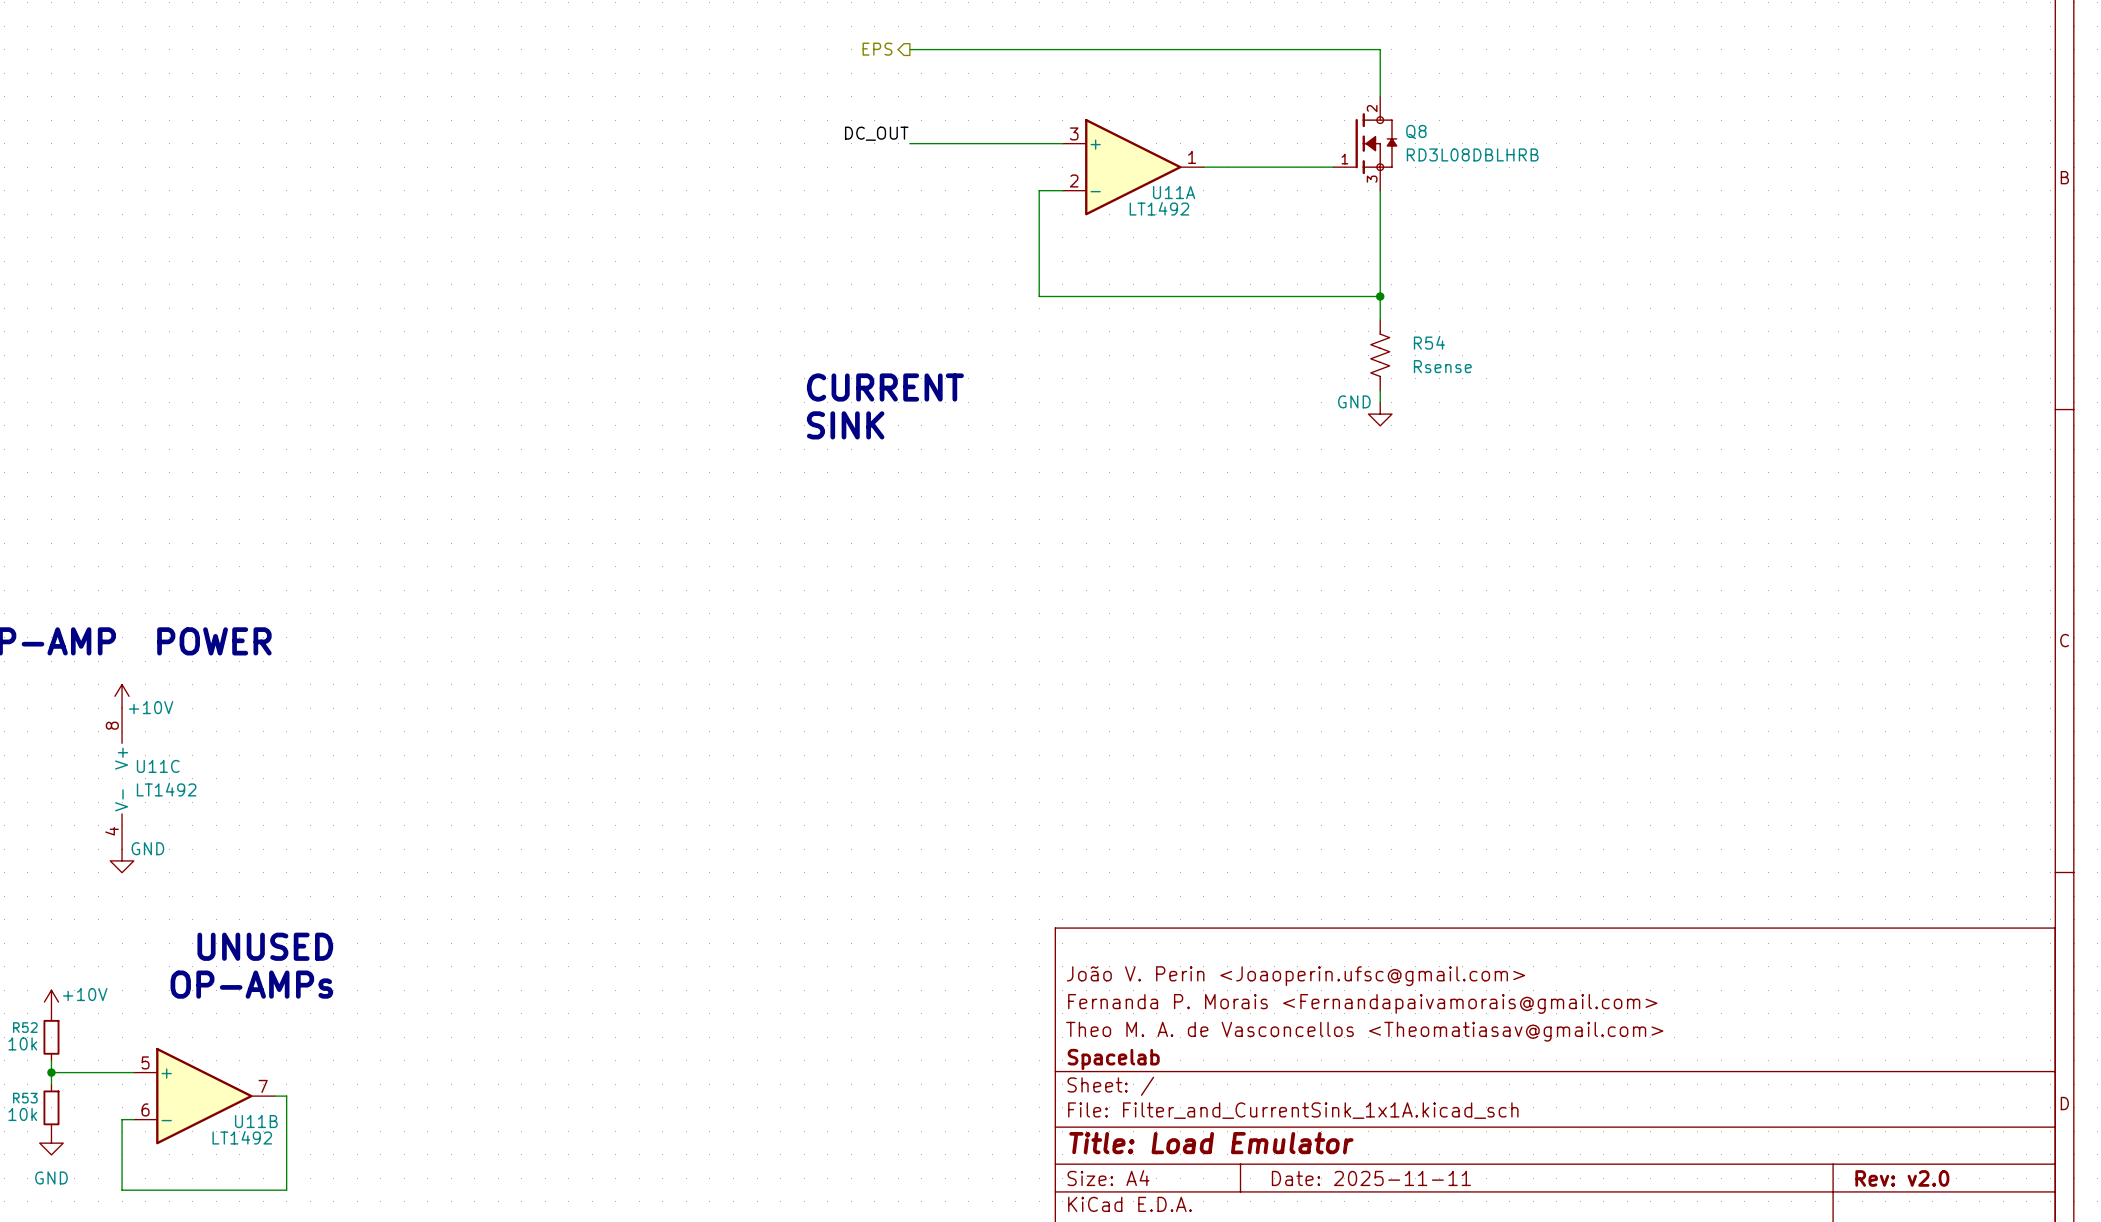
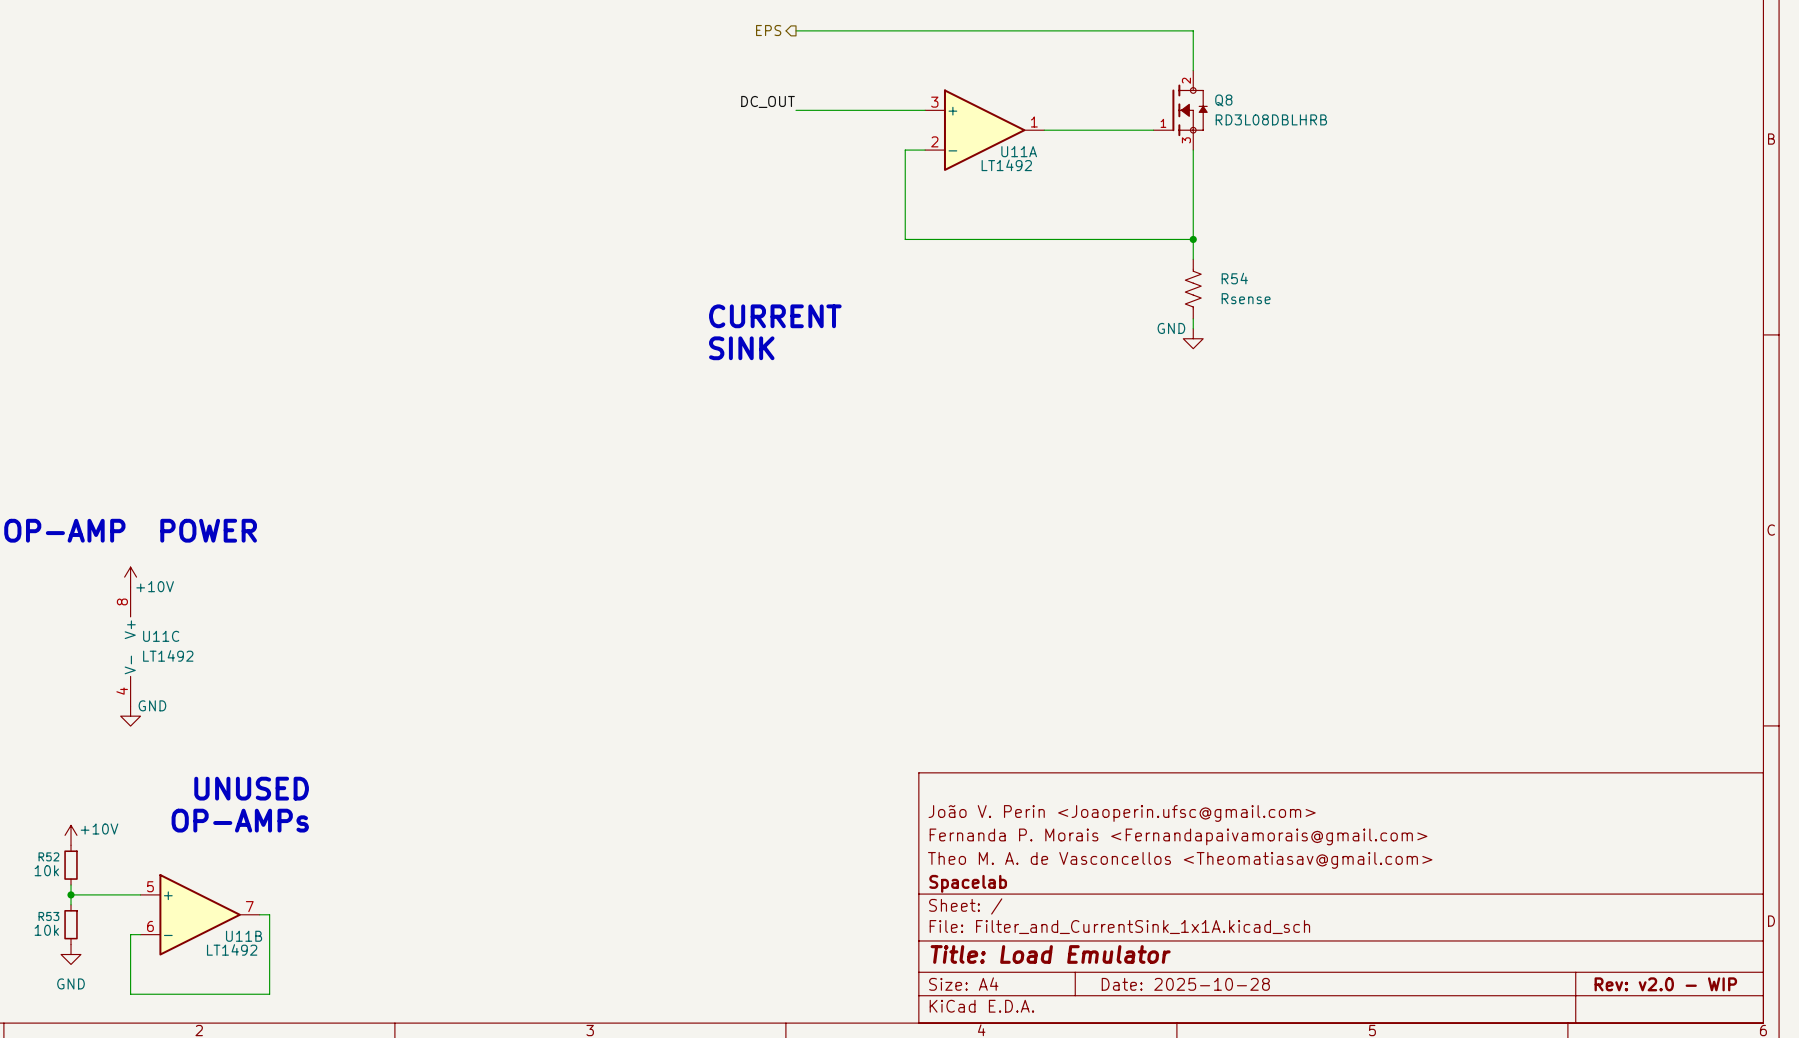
title block: Date: 2025-11-11 (1371, 1178) -> Date: 2025-10-28 (1185, 984)
title block: Rev: v2.0 (1902, 1178) -> Rev: v2.0 - WIP (1665, 984)

